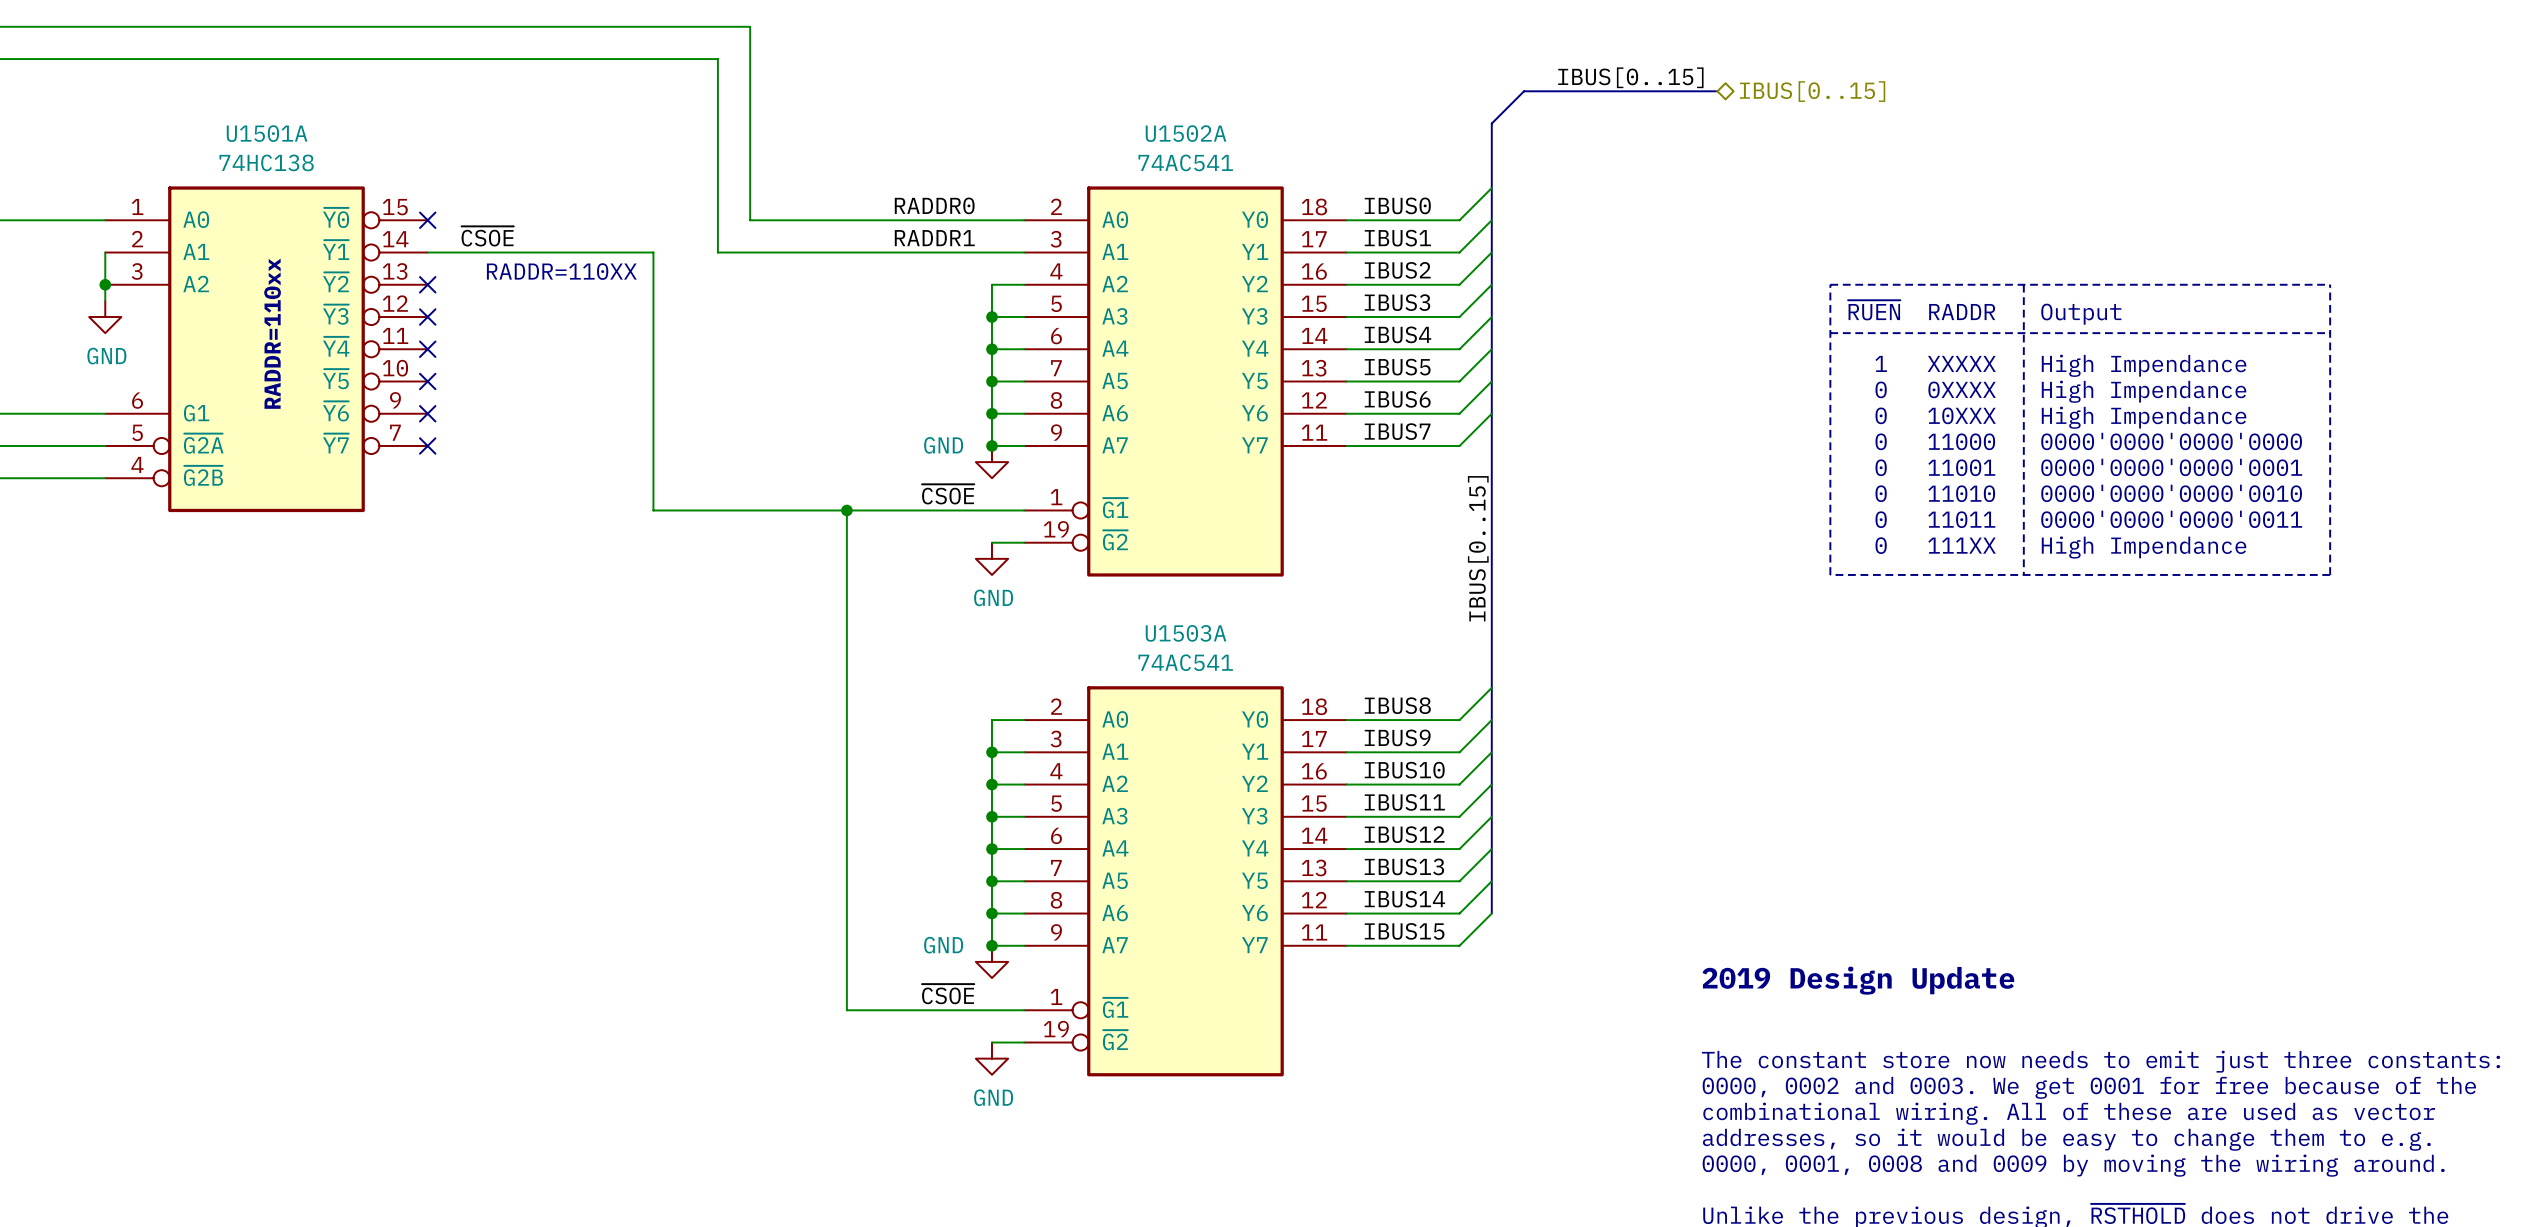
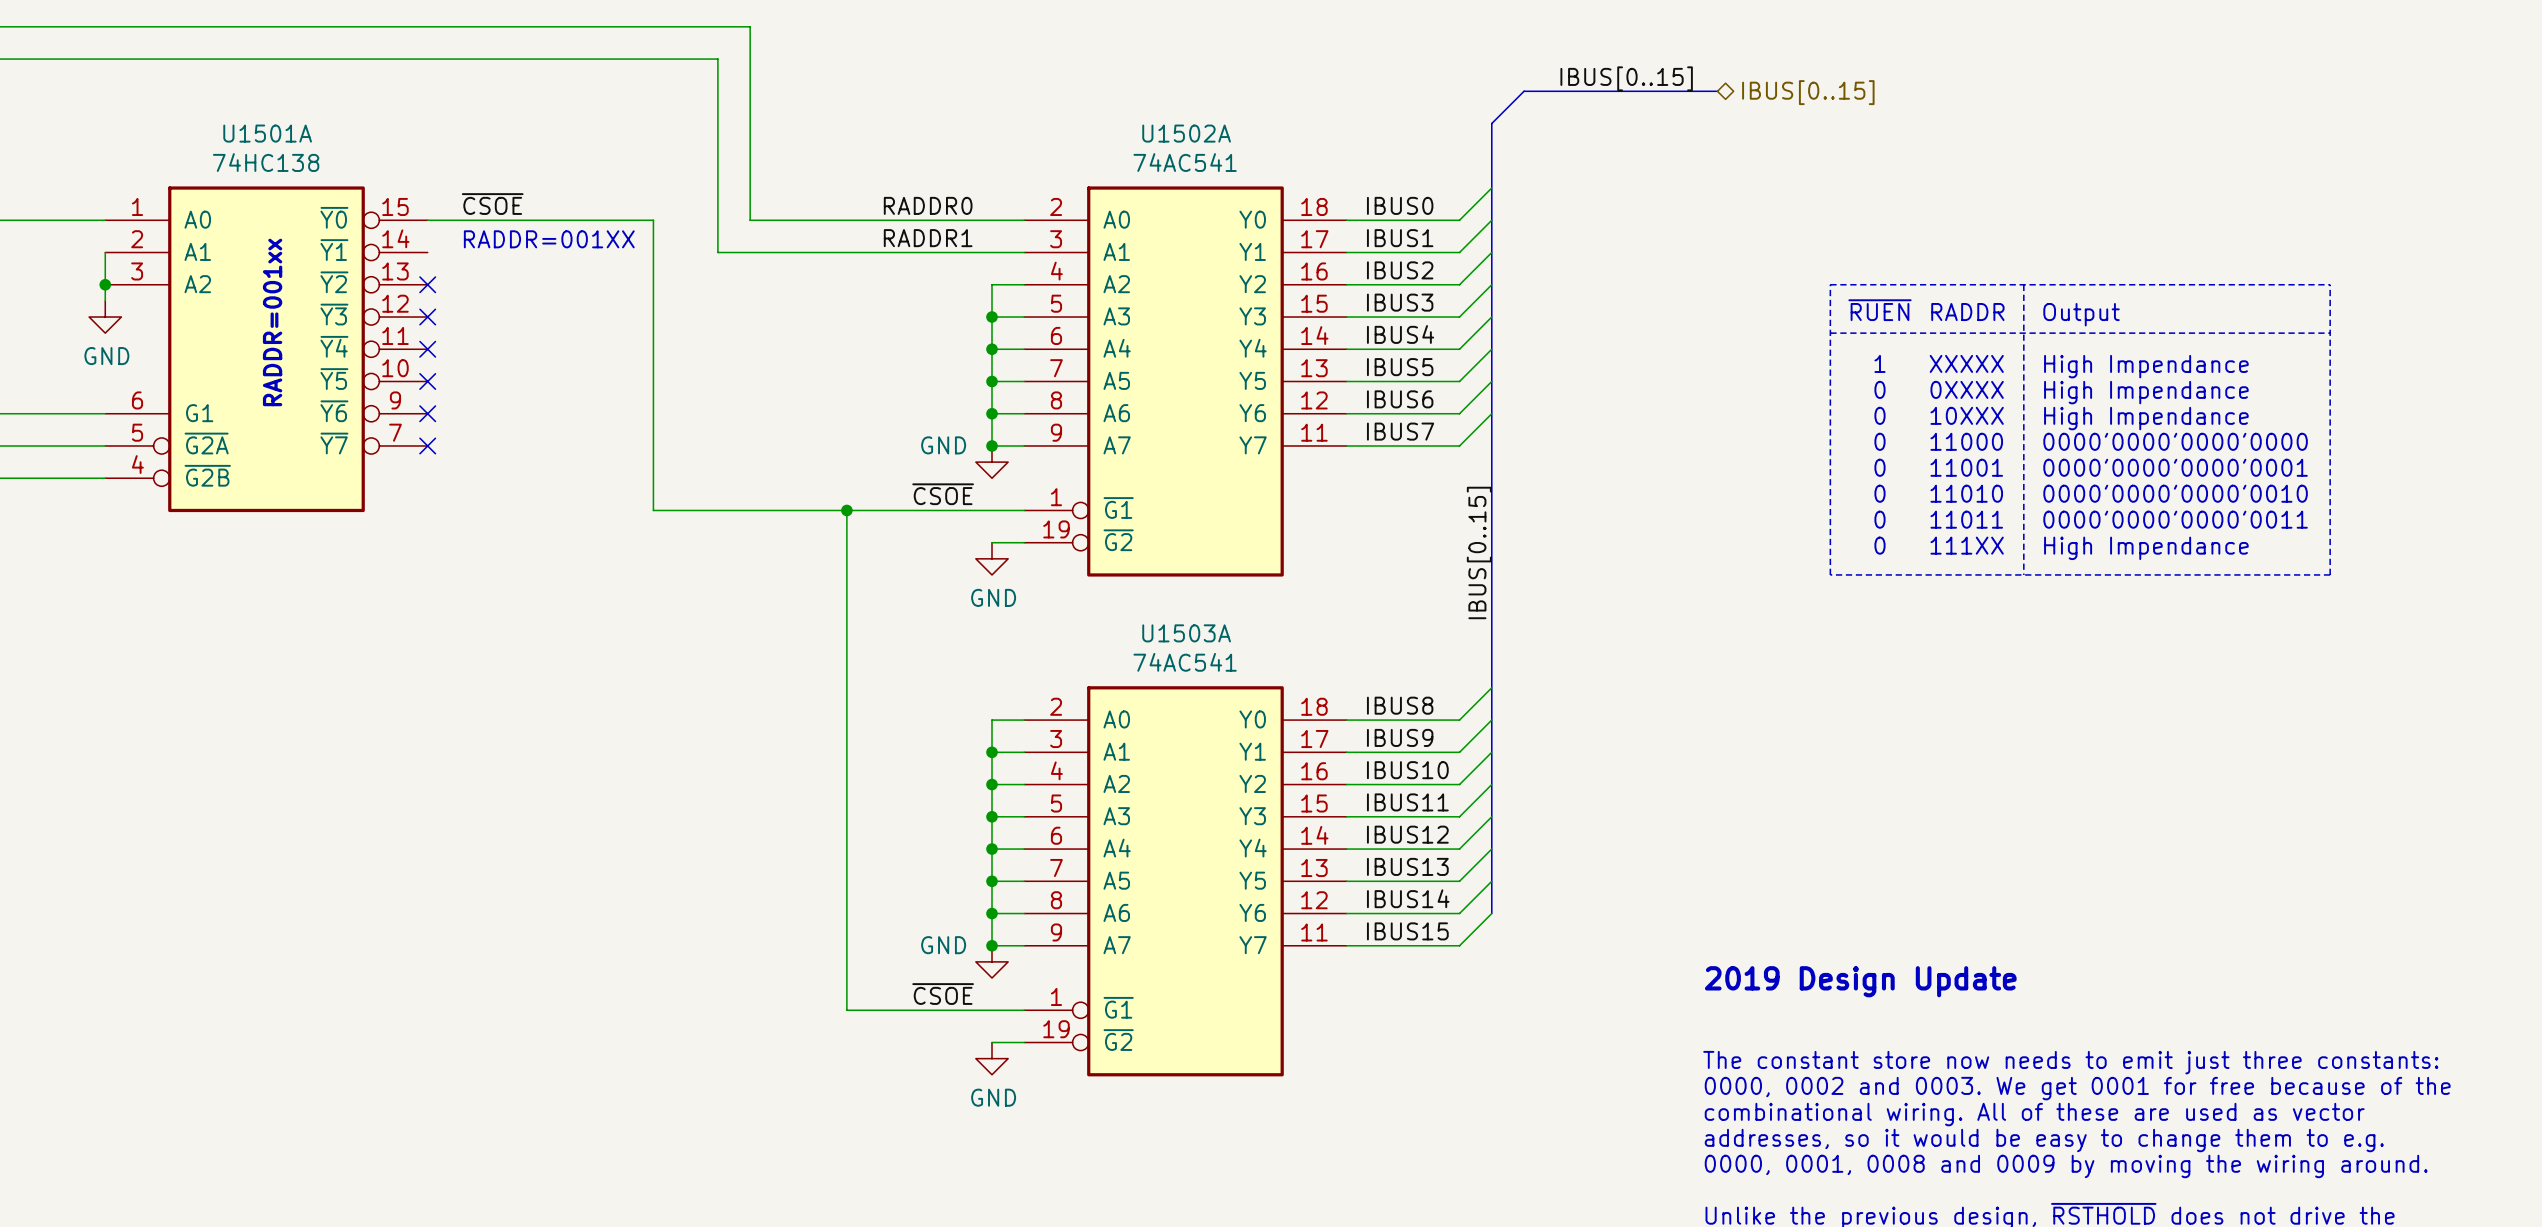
no-connect mark: (427, 220) -> none
label position: ~{CSOE} (487, 236) -> ~{CSOE} (492, 204)
wire: (427, 252) (653, 252) -> (427, 220) (653, 220) (653, 252)
text: RADDR=110XX (561, 271) -> RADDR=001XX (549, 239)
text: RADDR=110xx (272, 333) -> RADDR=001xx (272, 322)

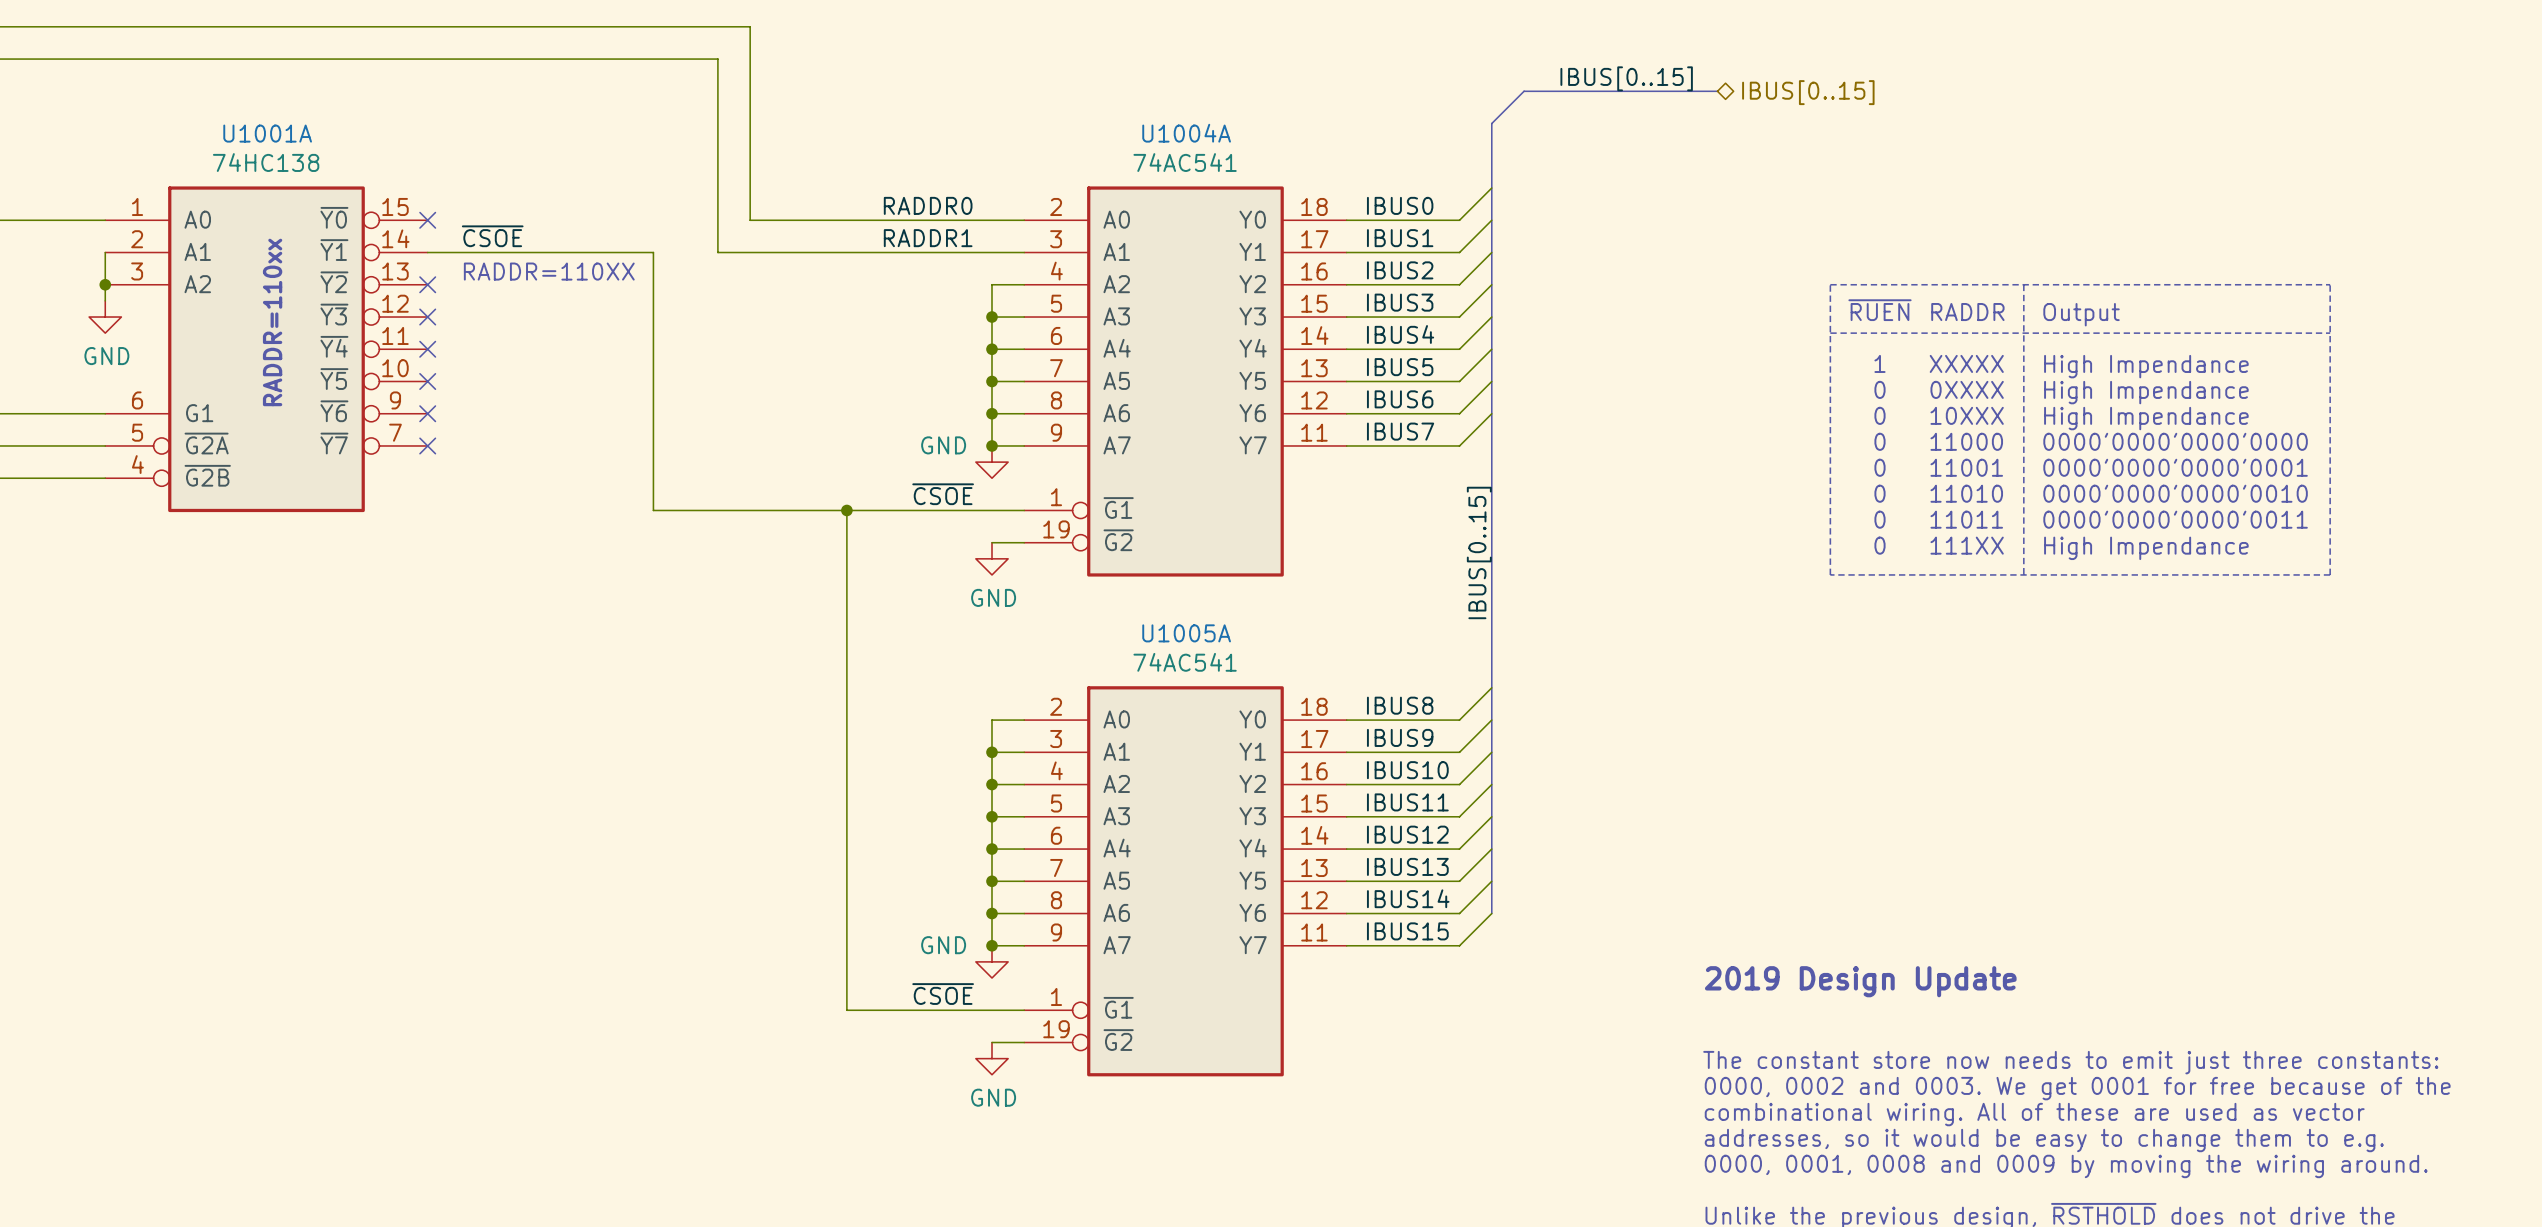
U1501A name: U1501A (267, 133) -> U1001A (267, 133)
U1502A name: U1502A (1186, 133) -> U1004A (1186, 133)
label position: ~{CSOE} (492, 204) -> ~{CSOE} (492, 236)
wire: (427, 220) (653, 220) (653, 252) -> (427, 252) (653, 252)
no-connect mark: none -> (427, 220)
text: RADDR=001XX (549, 239) -> RADDR=110XX (549, 271)
text: RADDR=001xx (272, 322) -> RADDR=110xx (272, 322)
U1503A name: U1503A (1186, 633) -> U1005A (1186, 633)

